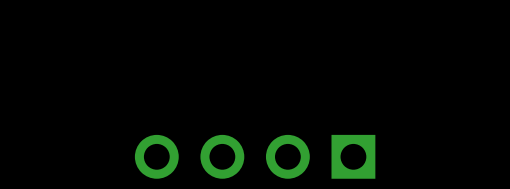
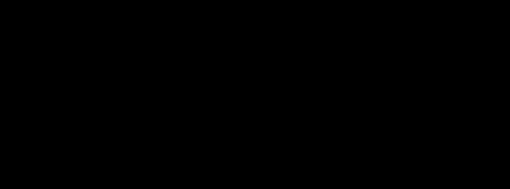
part: (255, 156) -> none

